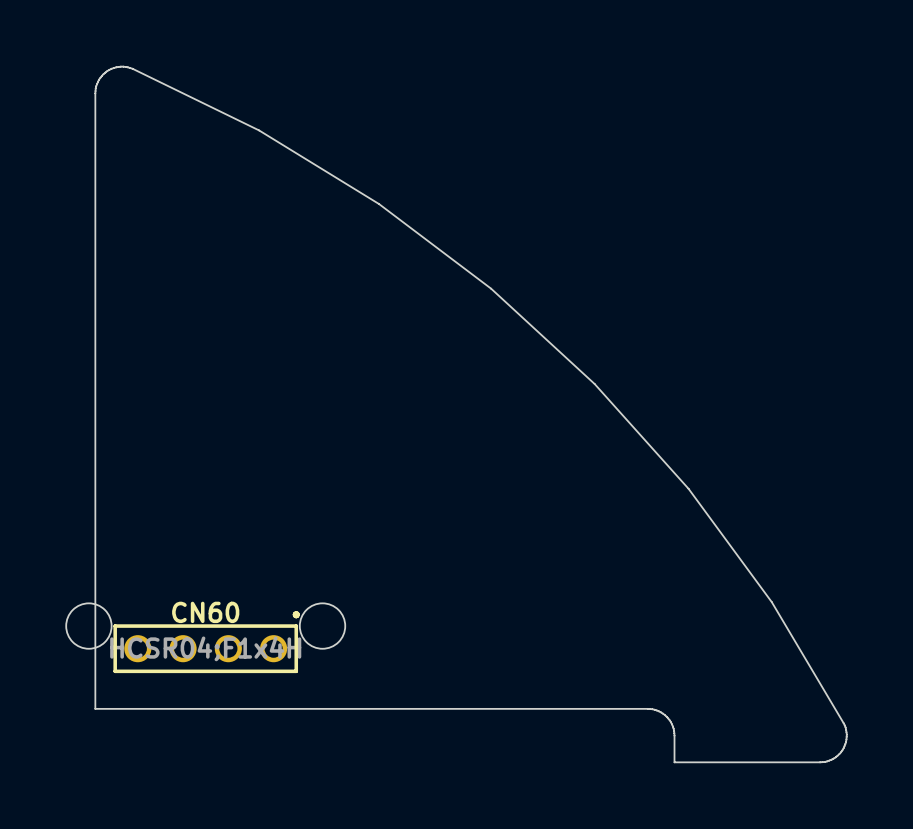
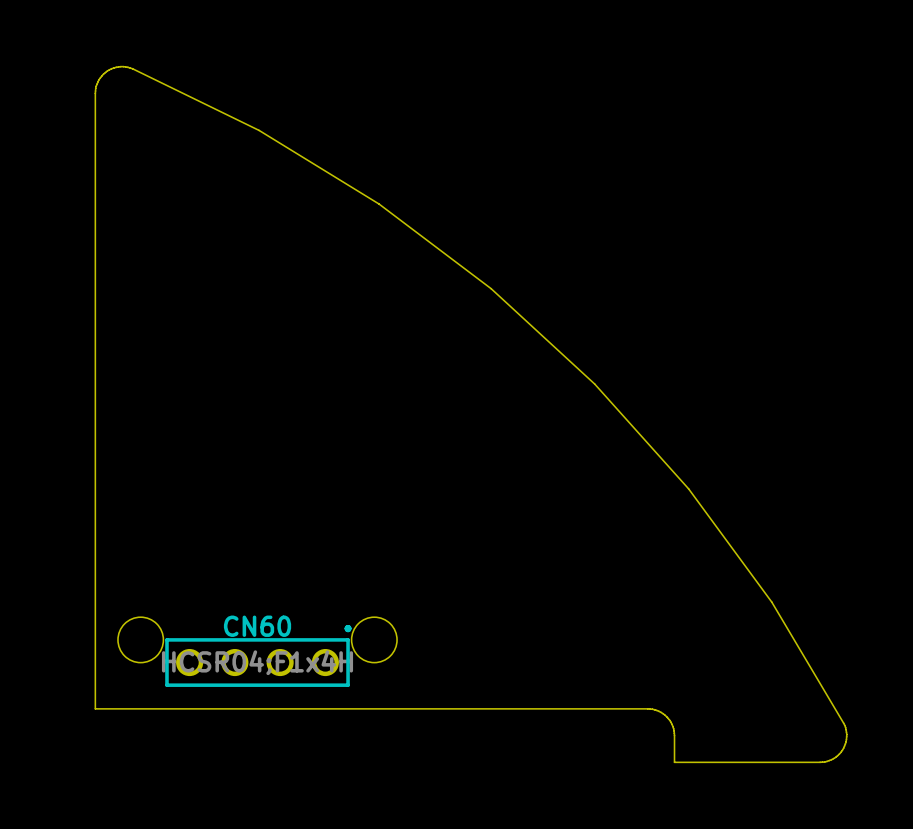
CN60 position: (205, 638) -> (257, 652)

